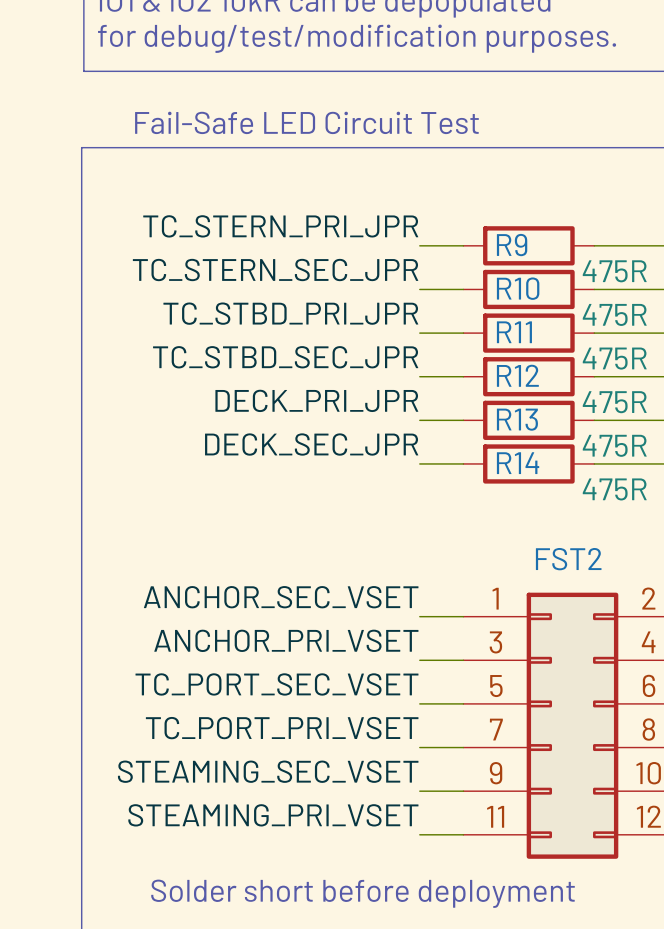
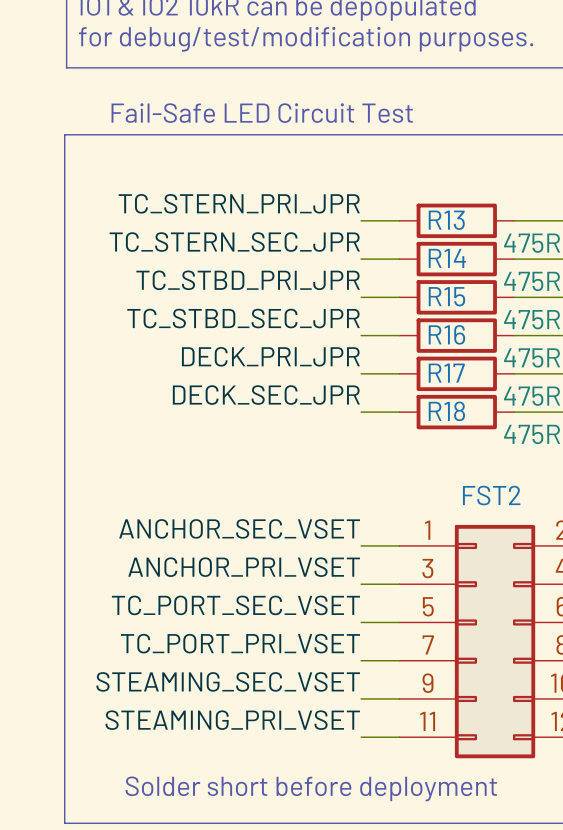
R9 name: R9 (512, 245) -> R13 (446, 220)
R10 name: R10 (518, 288) -> R14 (447, 258)
R11 name: R11 (514, 332) -> R15 (446, 296)
R12 name: R12 (517, 375) -> R16 (446, 334)
R13 name: R13 (517, 419) -> R17 (446, 373)
R14 name: R14 (518, 463) -> R18 (446, 411)

